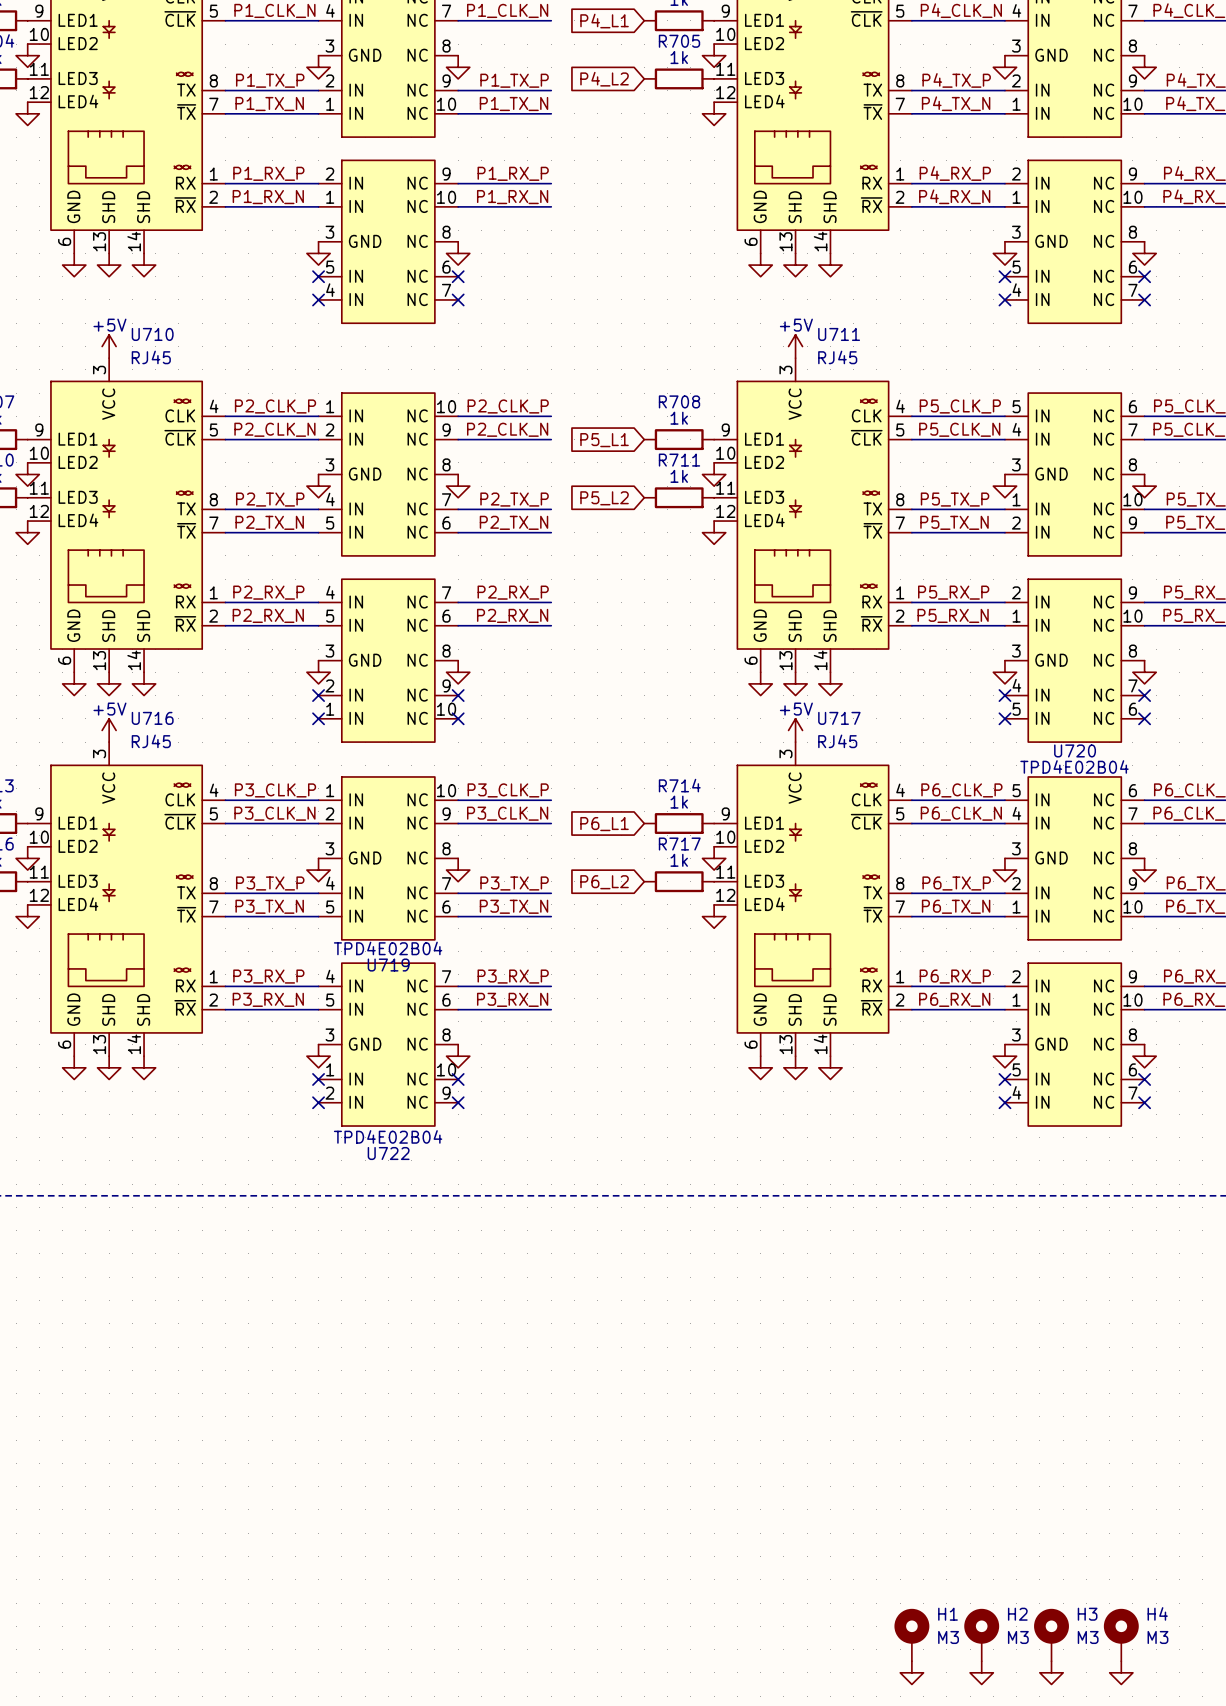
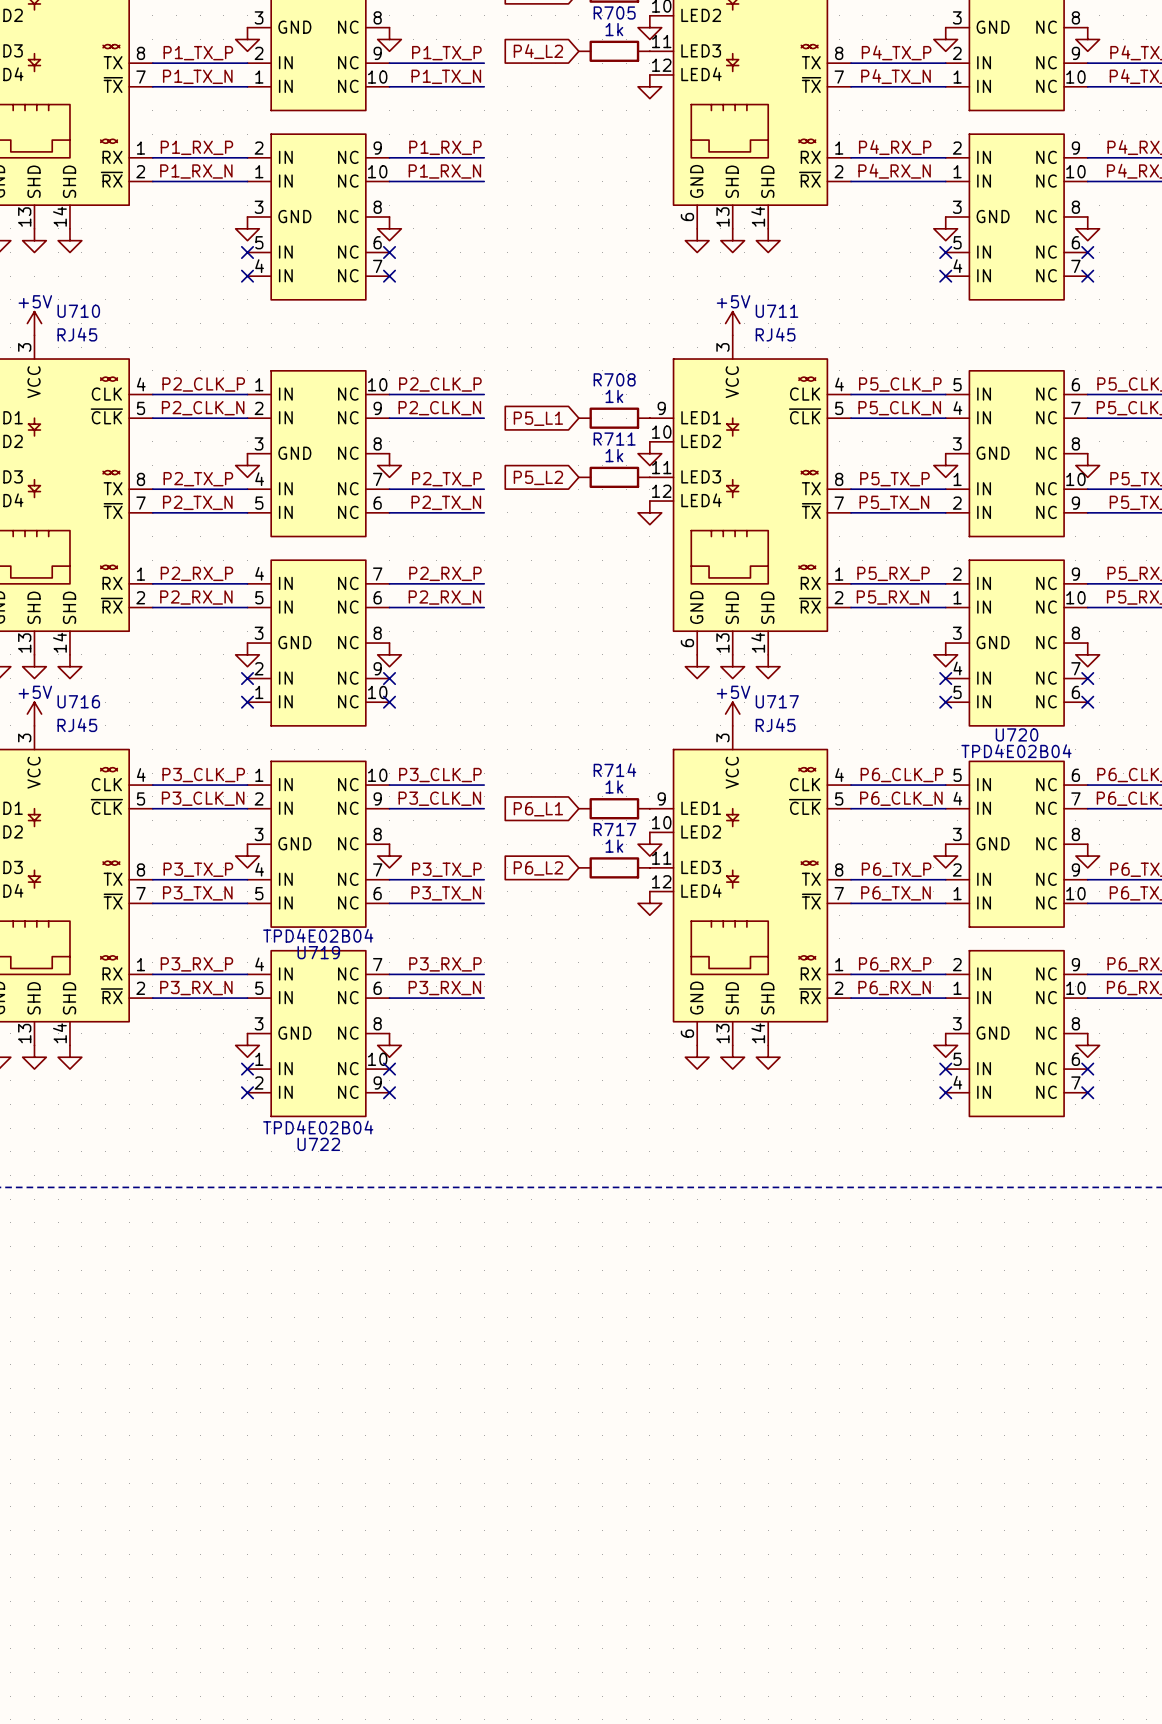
H1: M3 (911, 1635) -> none
H2: M3 (981, 1635) -> none
H3: M3 (1051, 1635) -> none
H4: M3 (1121, 1635) -> none
power symbol: (911, 1672) -> none
power symbol: (981, 1672) -> none
power symbol: (1051, 1672) -> none
power symbol: (1121, 1672) -> none

